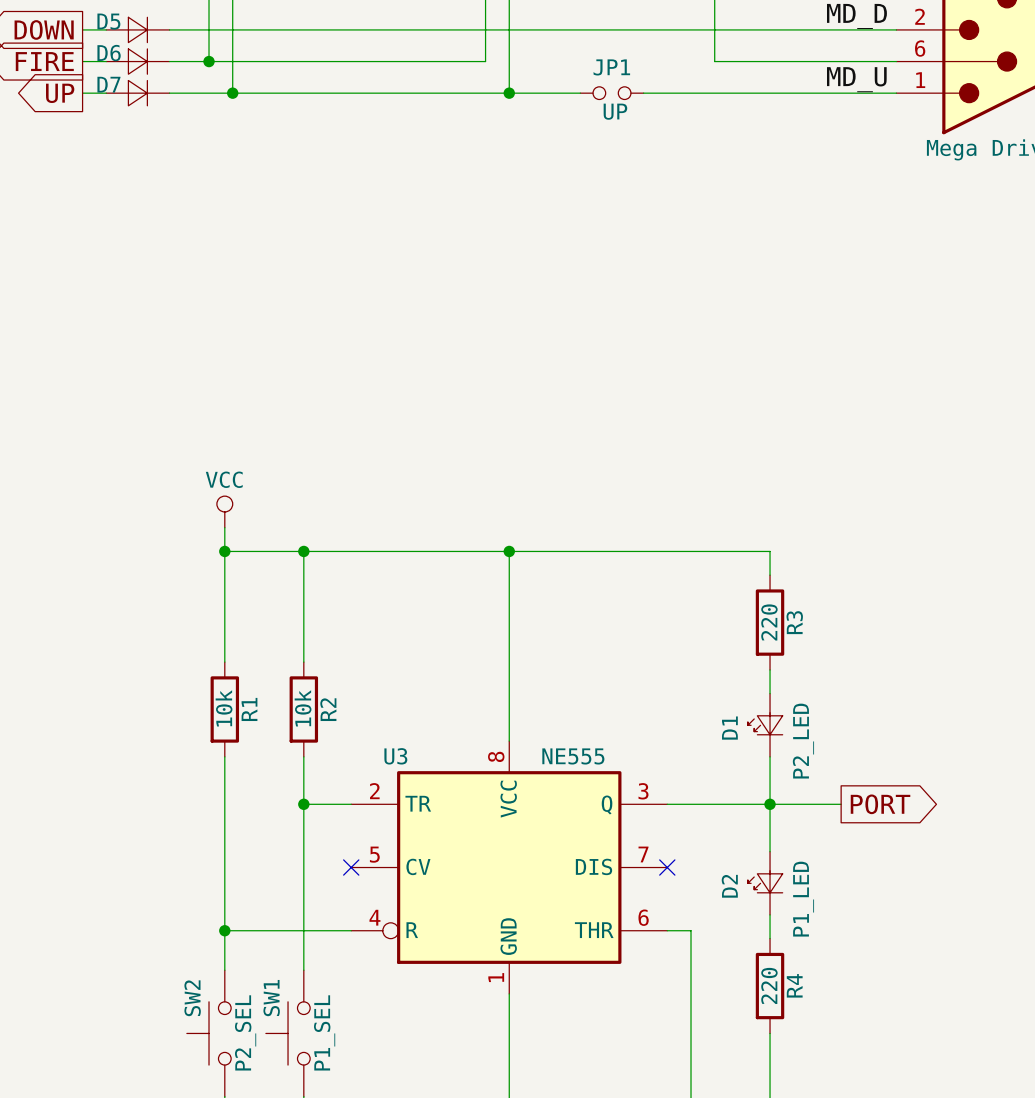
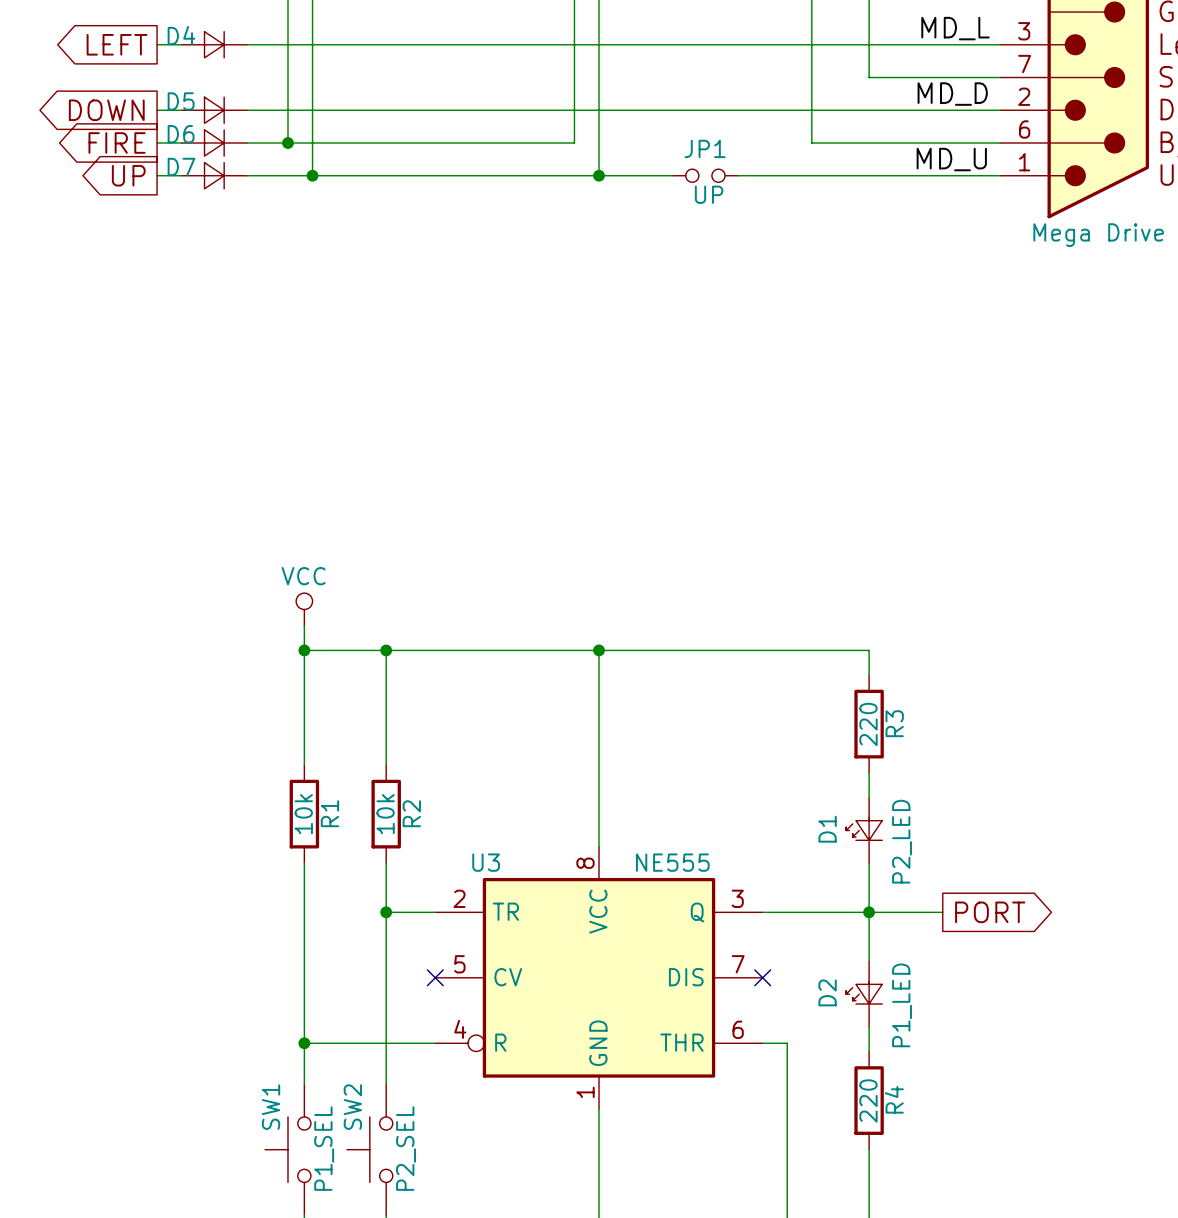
SW2 name: SW2 (192, 998) -> SW1 (271, 1107)
SW1 name: SW1 (271, 998) -> SW2 (352, 1107)
SW2 value: P2_SEL (245, 1032) -> P1_SEL (324, 1148)
SW1 value: P1_SEL (324, 1032) -> P2_SEL (406, 1148)

